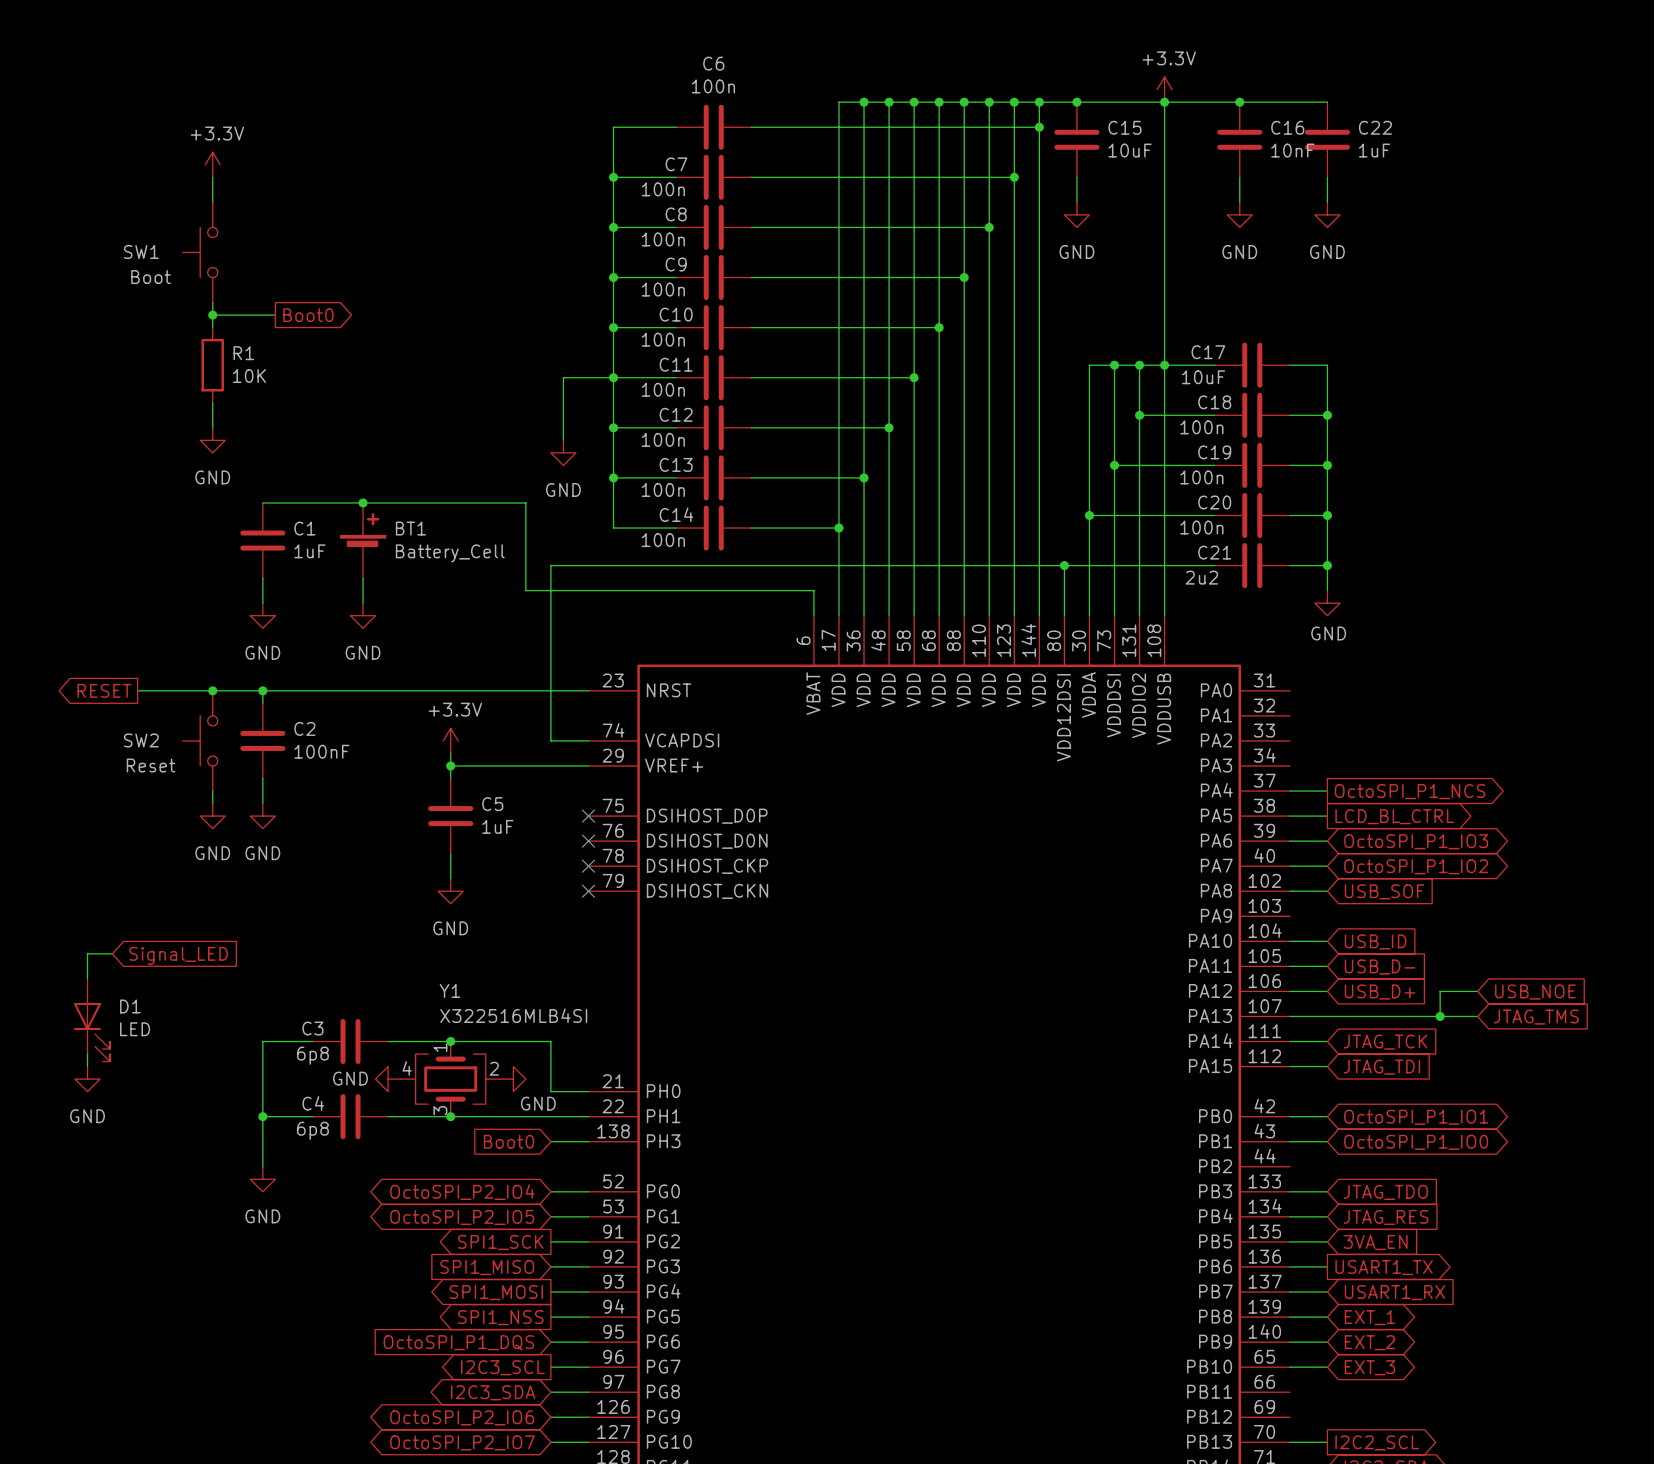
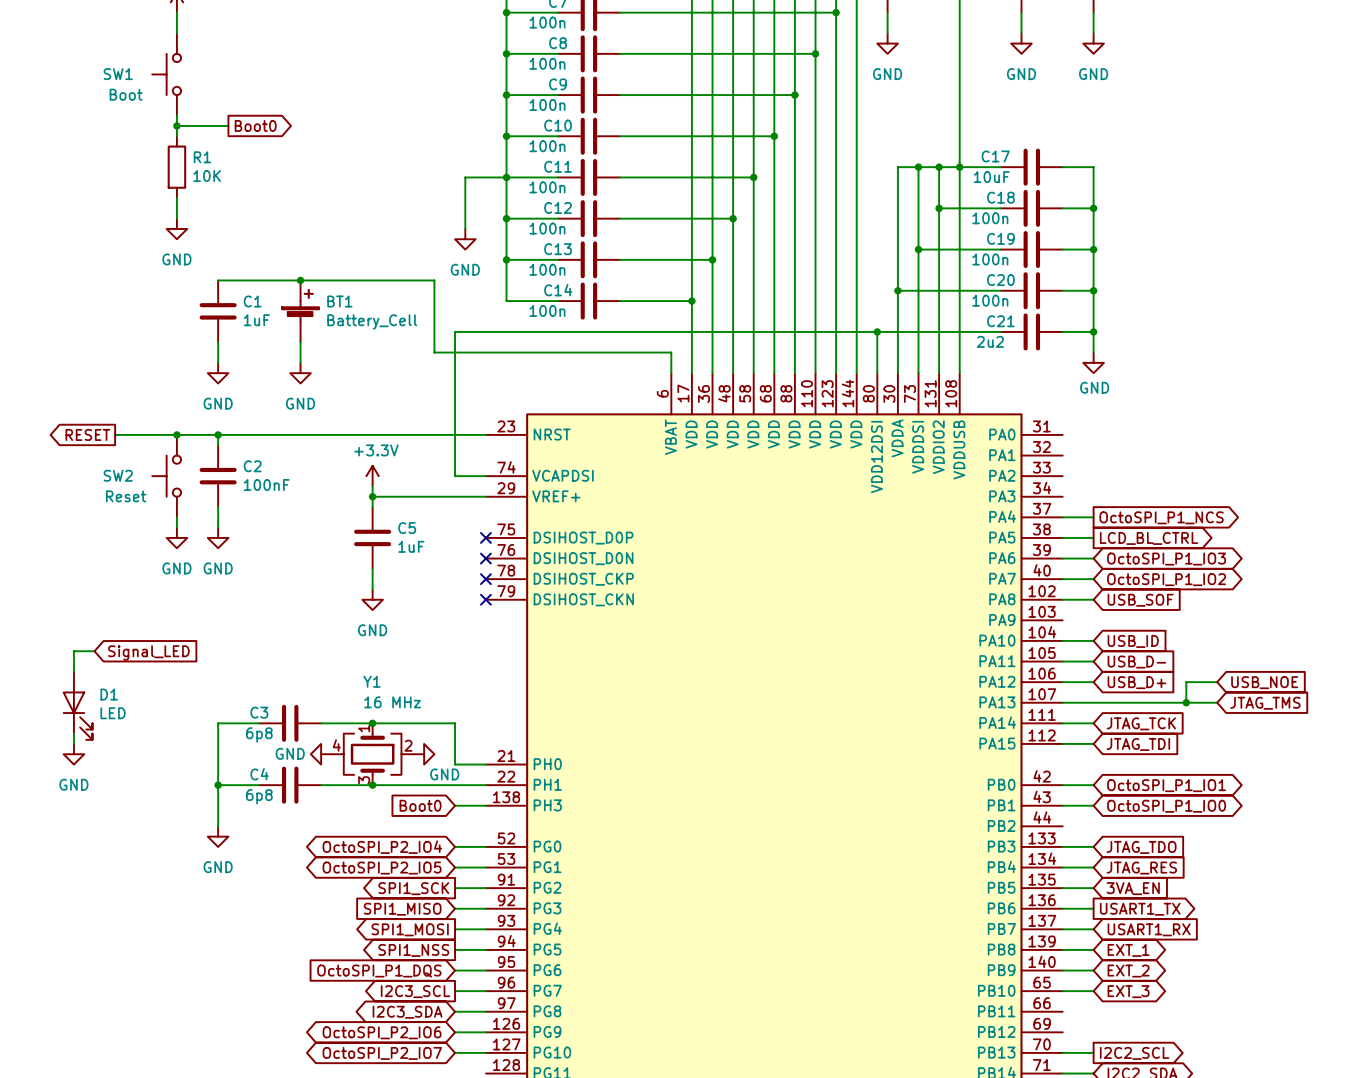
Y1 value: X322516MLB4SI (513, 1015) -> 16 MHz (392, 702)

